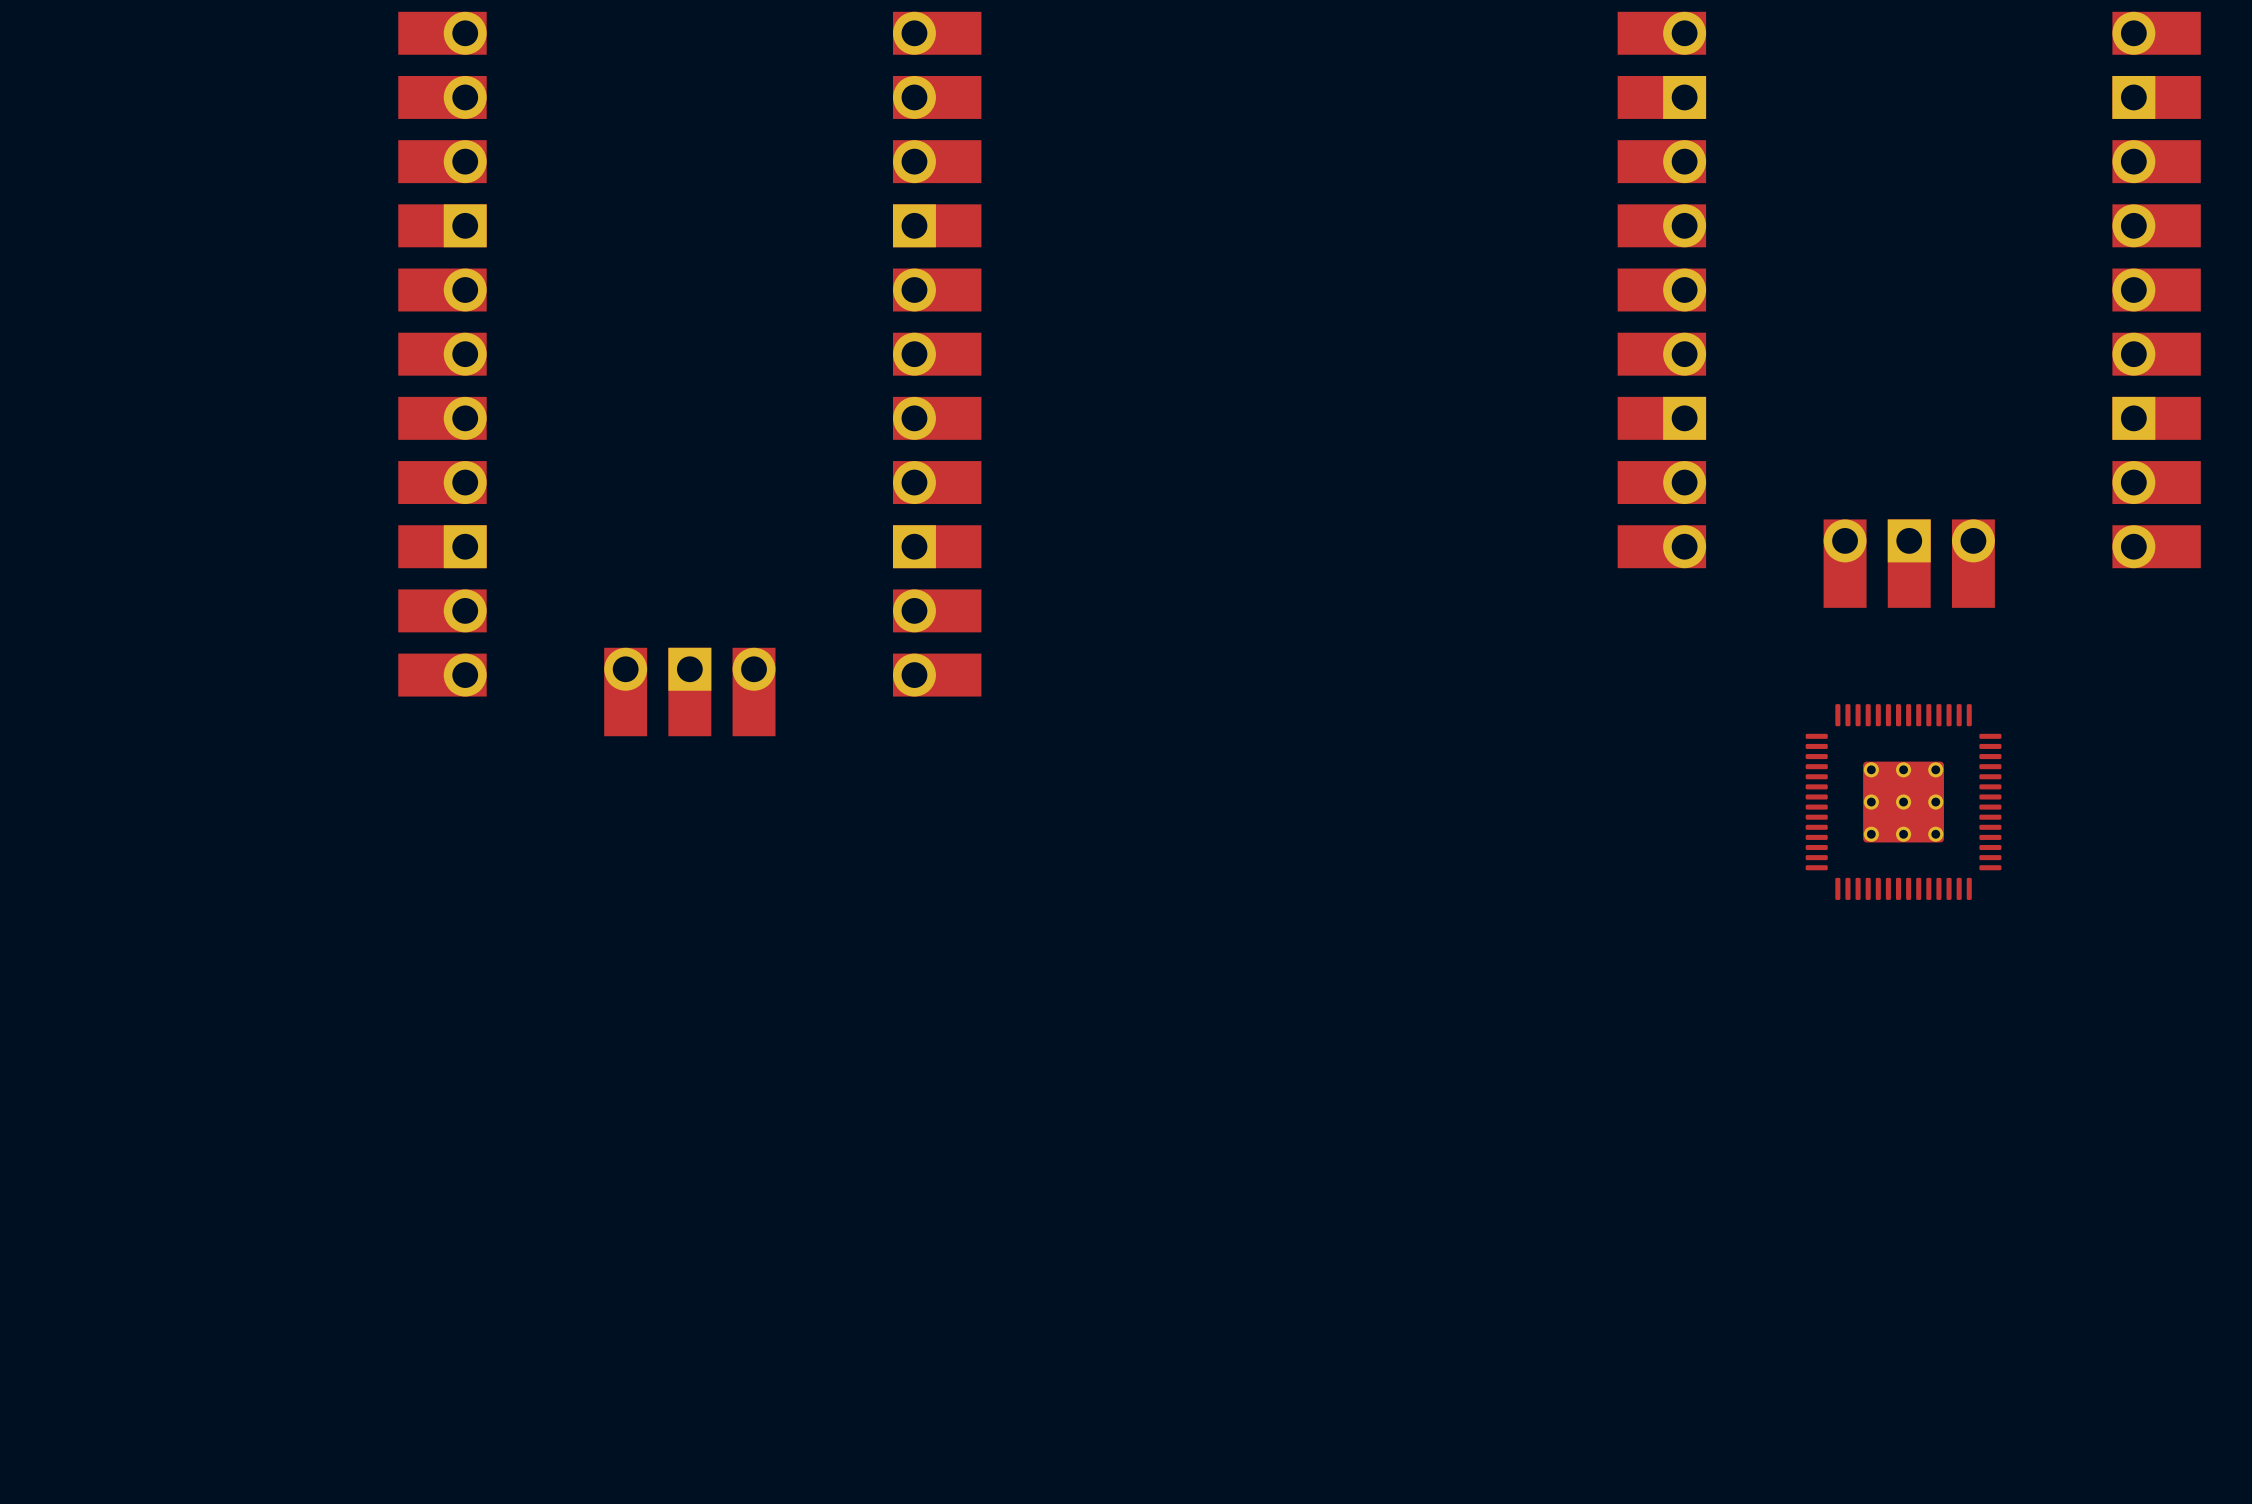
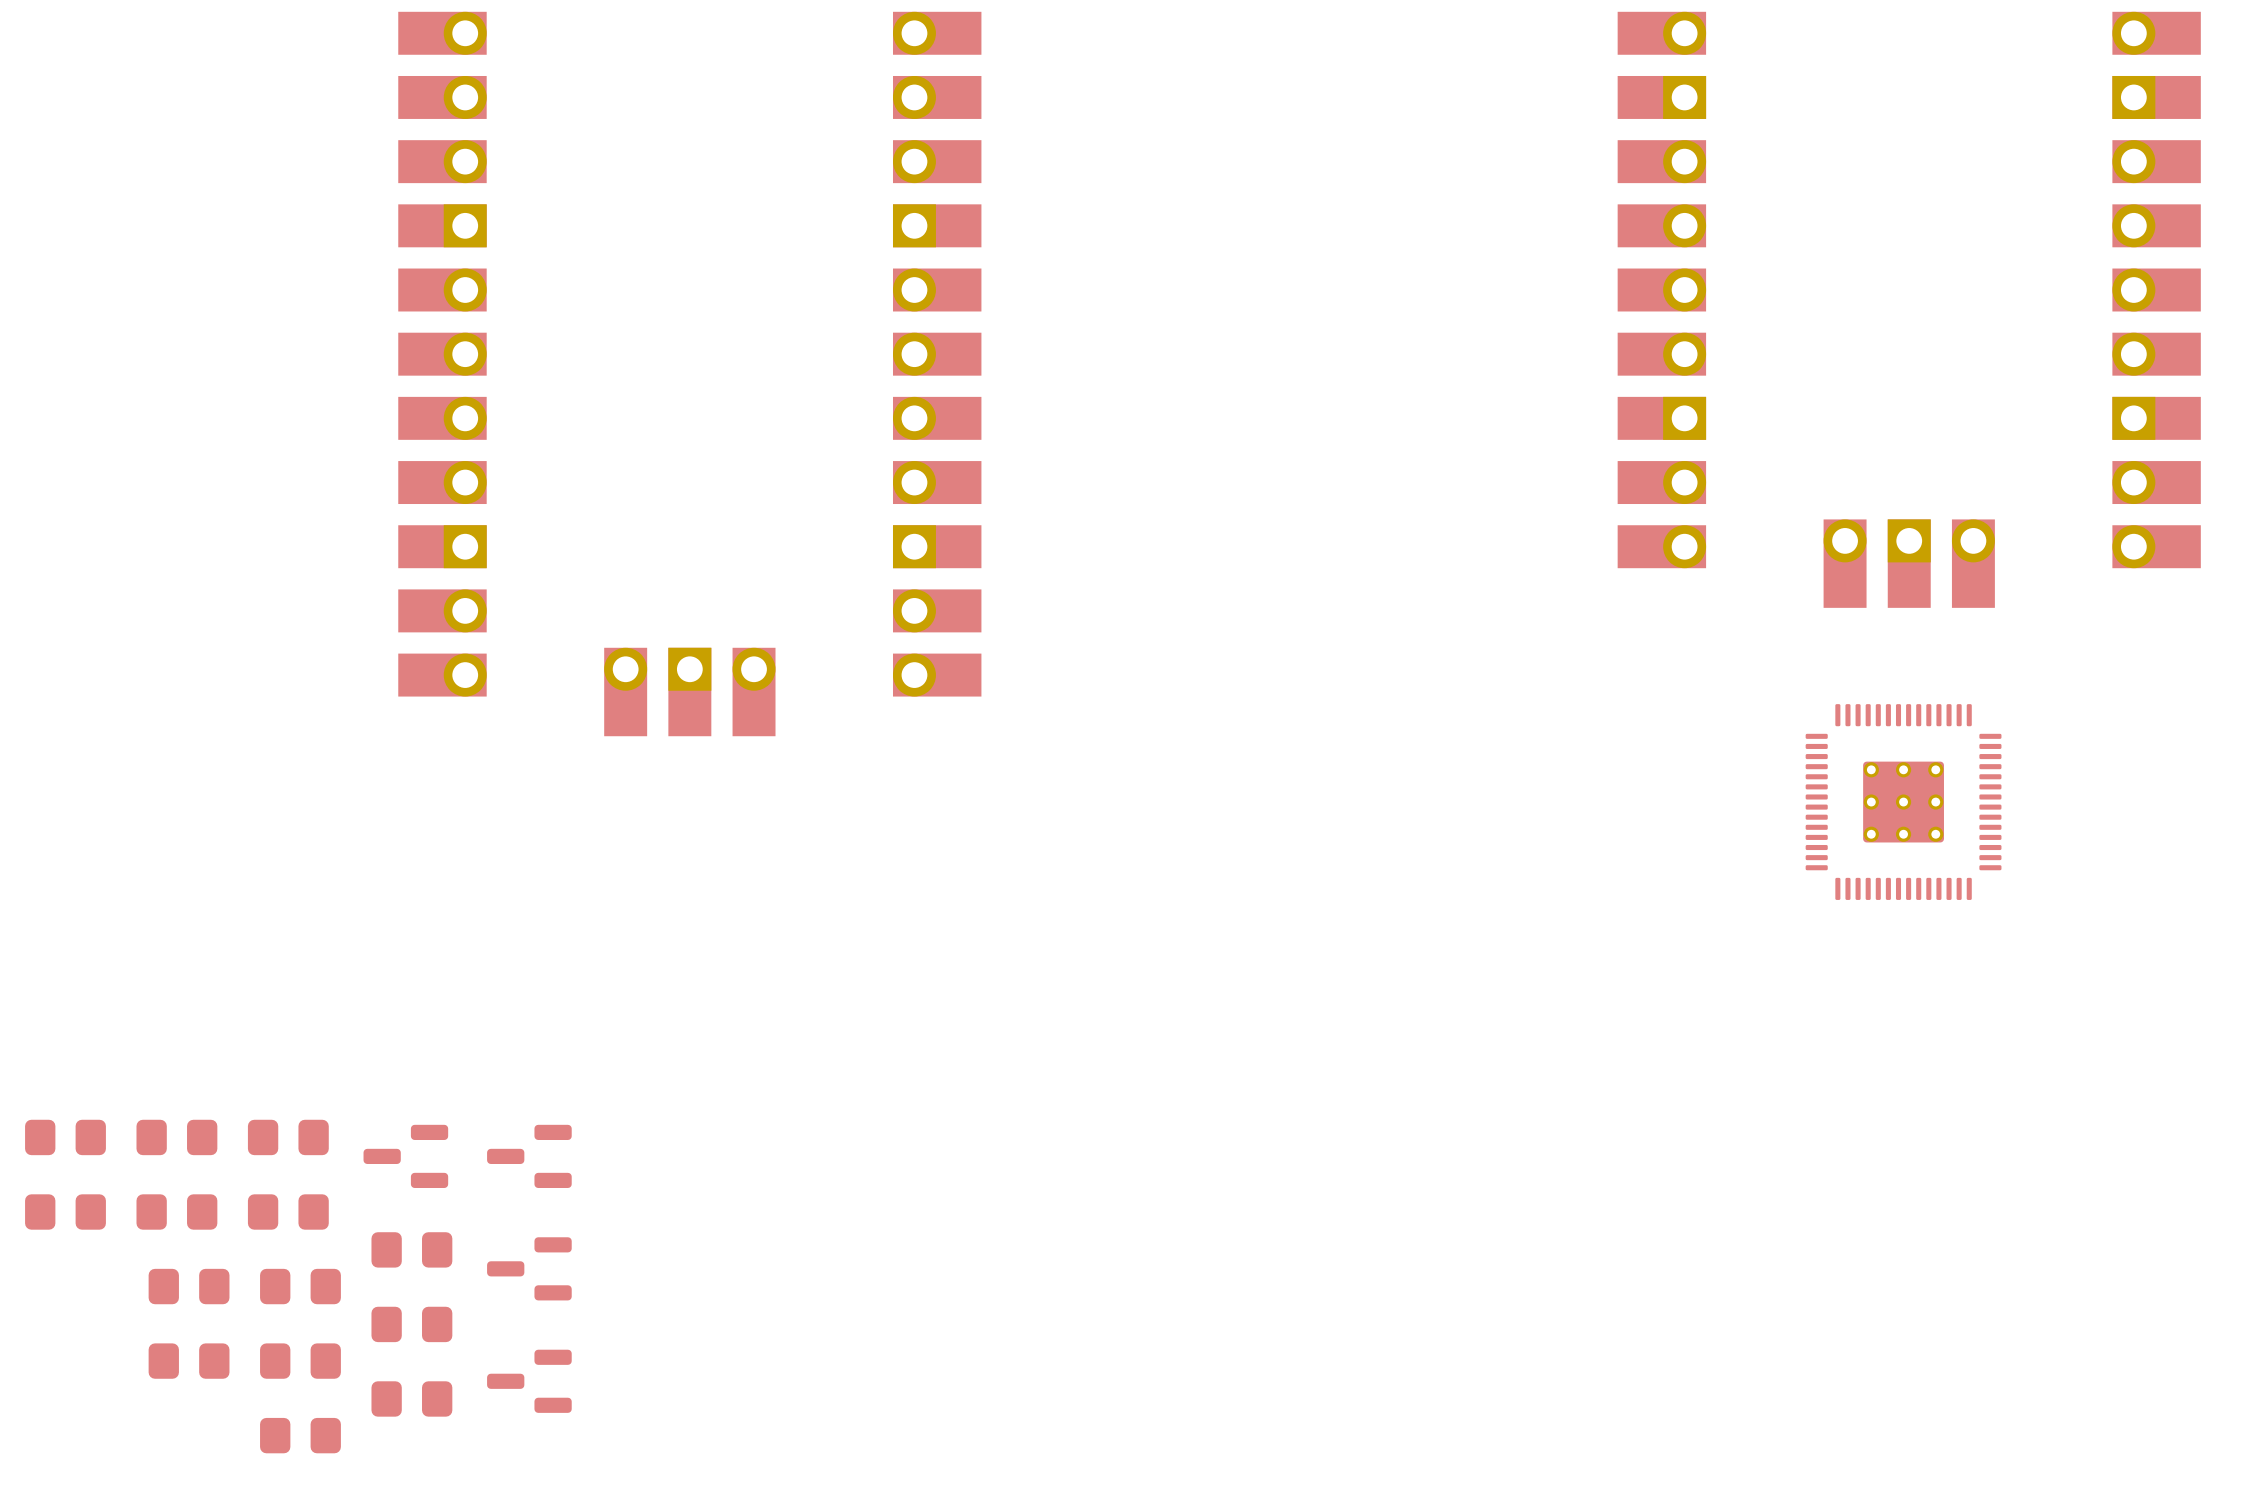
part: none -> (65, 1137)
part: none -> (176, 1137)
part: none -> (288, 1137)
part: none -> (405, 1156)
part: none -> (529, 1156)
part: none -> (65, 1212)
part: none -> (176, 1212)
part: none -> (288, 1212)
part: none -> (411, 1249)
part: none -> (529, 1268)
part: none -> (189, 1286)
part: none -> (300, 1286)
part: none -> (411, 1324)
part: none -> (189, 1361)
part: none -> (300, 1361)
part: none -> (529, 1381)
part: none -> (411, 1398)
part: none -> (300, 1435)

